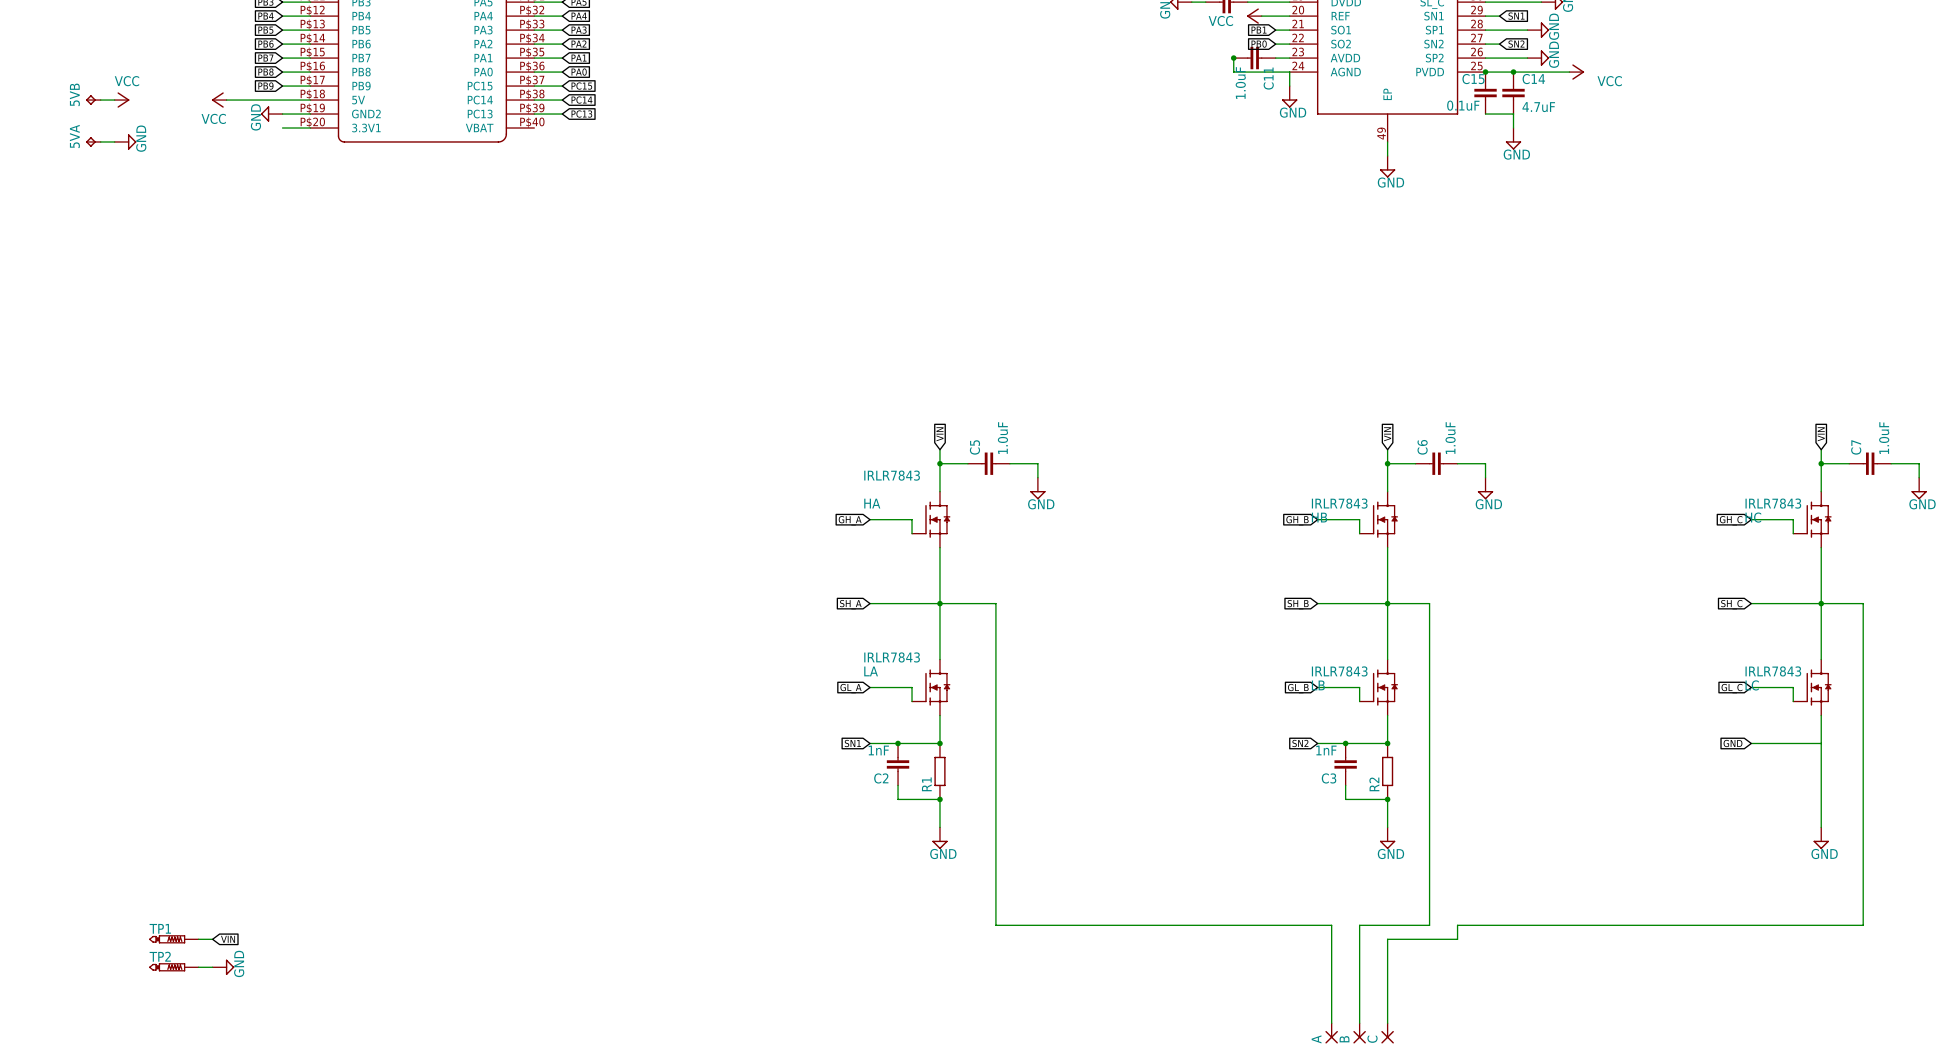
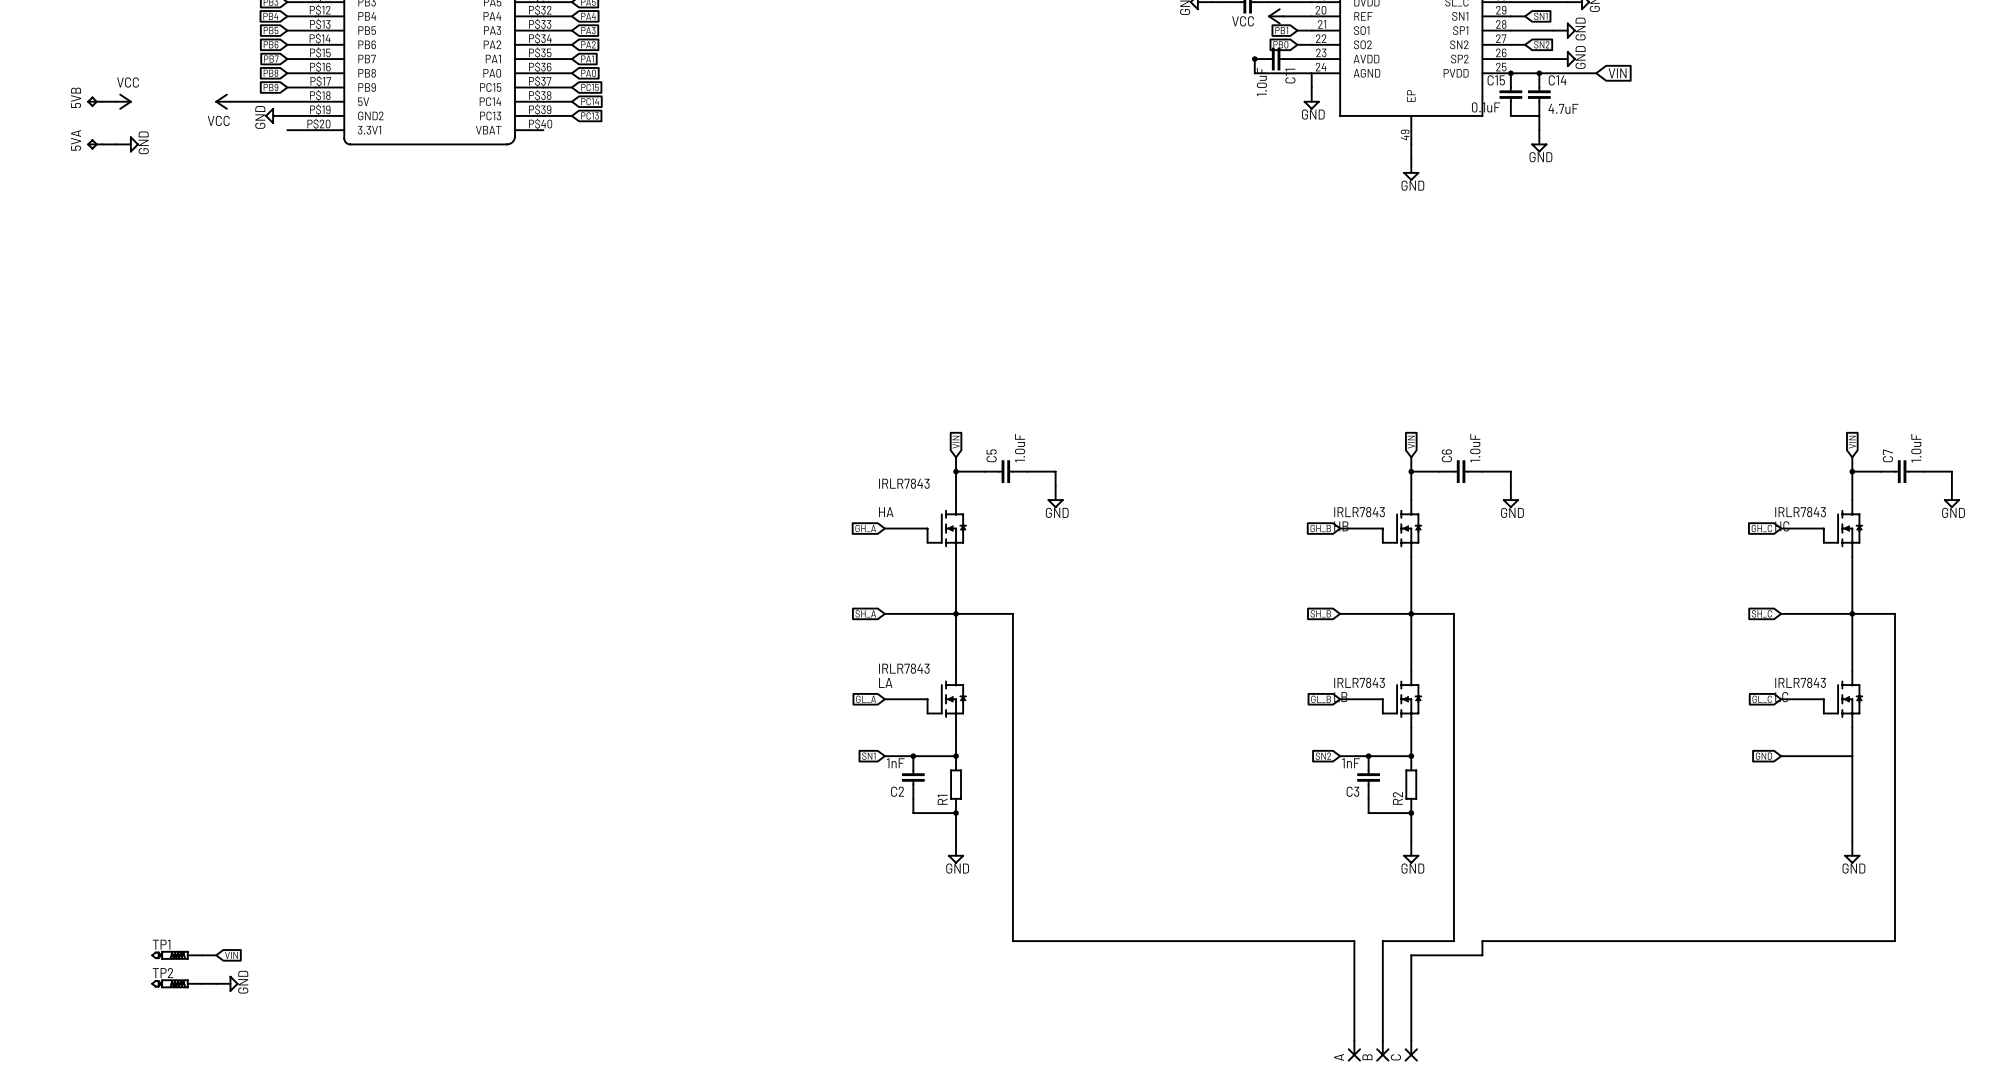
power symbol: VCC (1576, 72) -> none
global label: none -> VIN (1617, 73)

